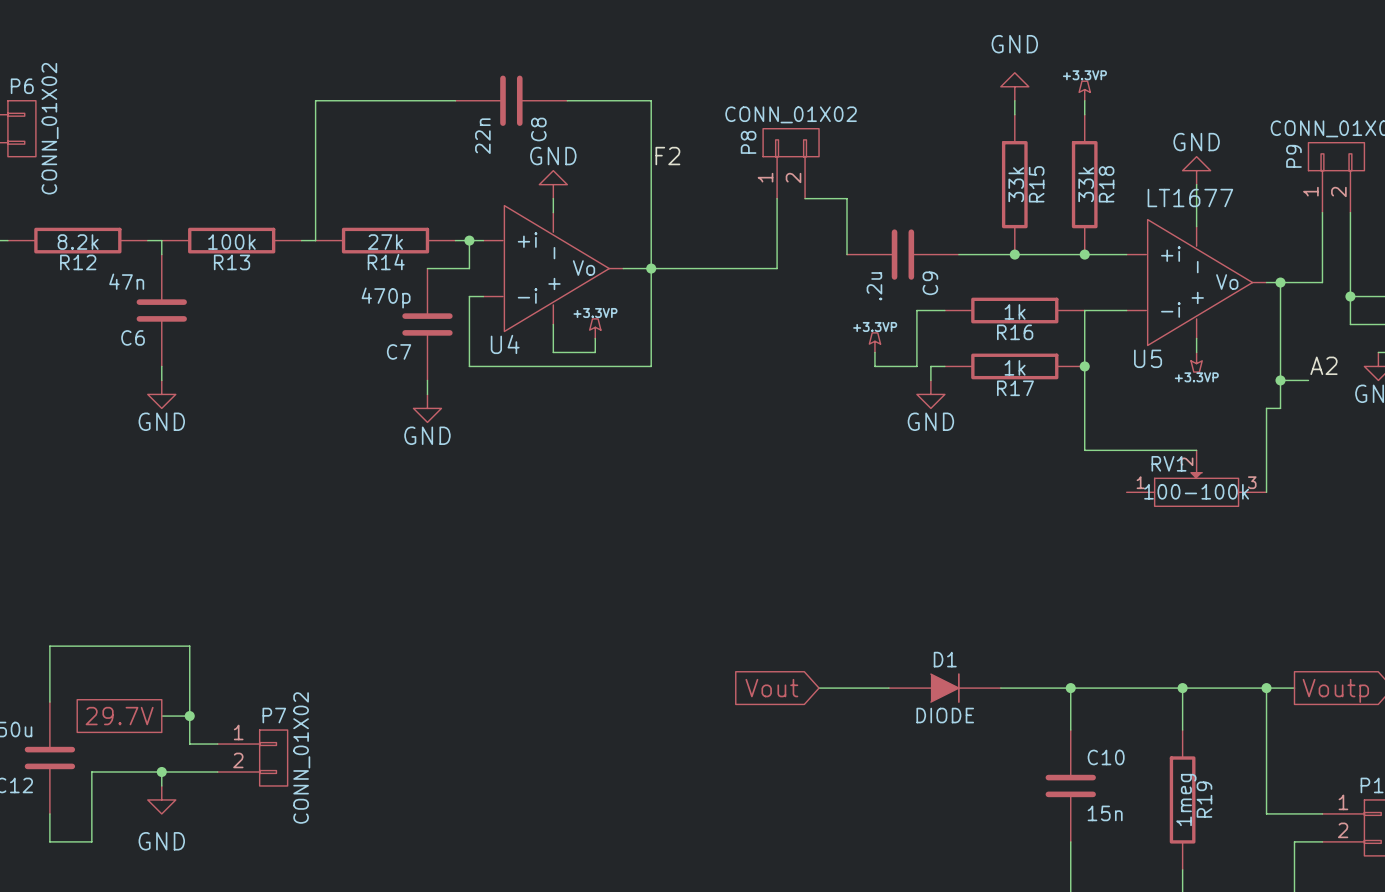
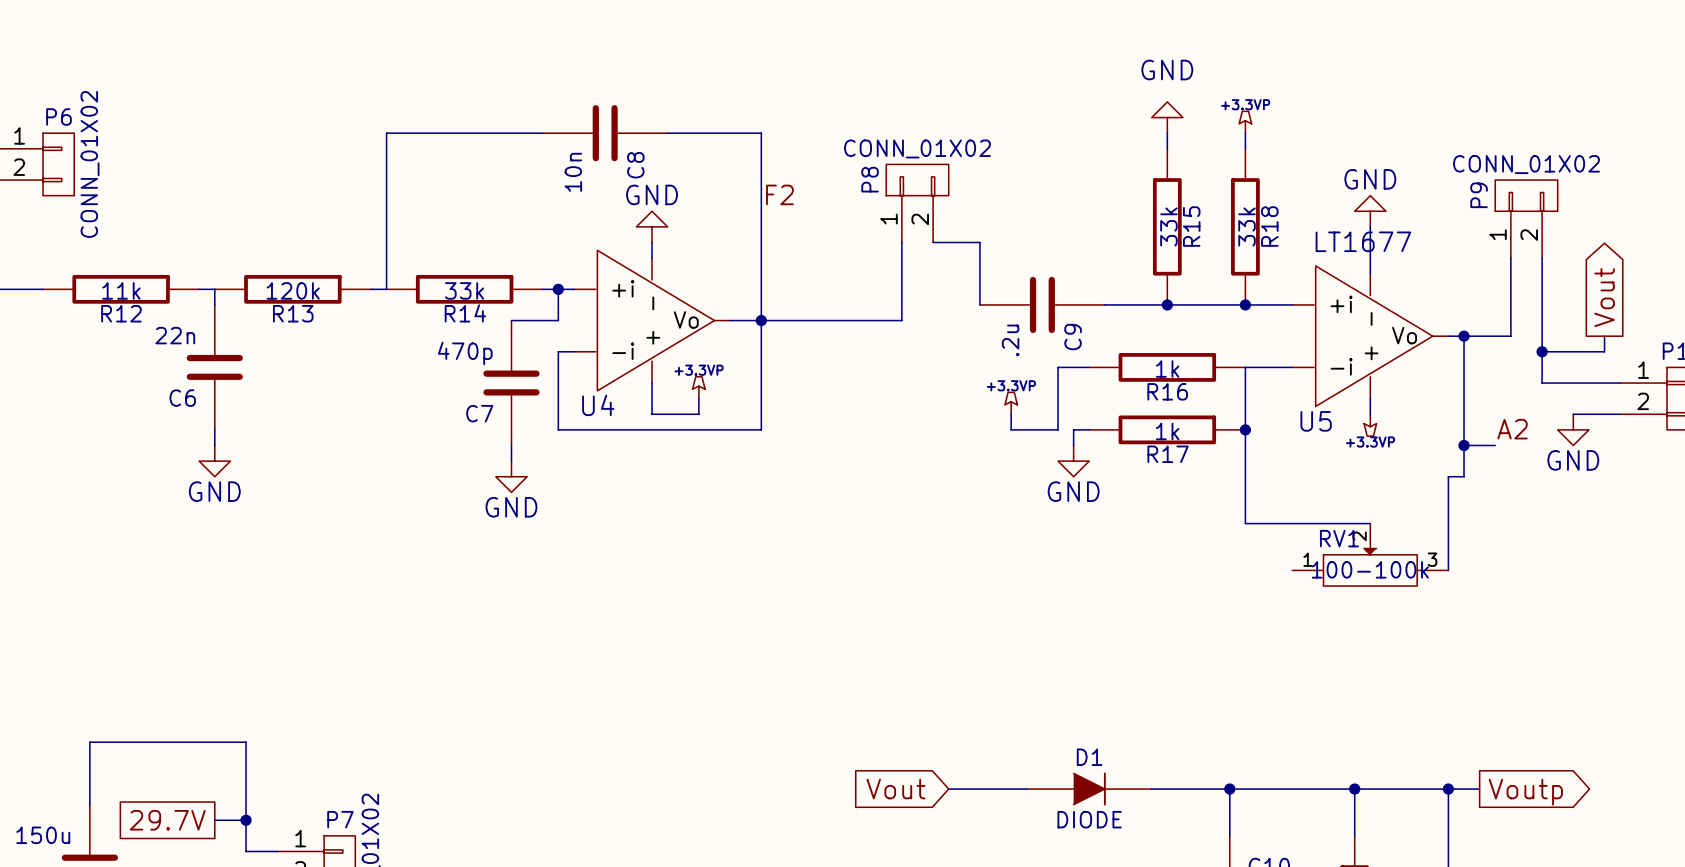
C8 value: 22n (482, 136) -> 10n (573, 172)
R12 value: 8.2k (78, 242) -> 11k (121, 290)
R13 value: 100k (231, 242) -> 120k (293, 290)
R14 value: 27k (385, 242) -> 33k (464, 290)
C6 value: 47n (126, 281) -> 22n (175, 335)

